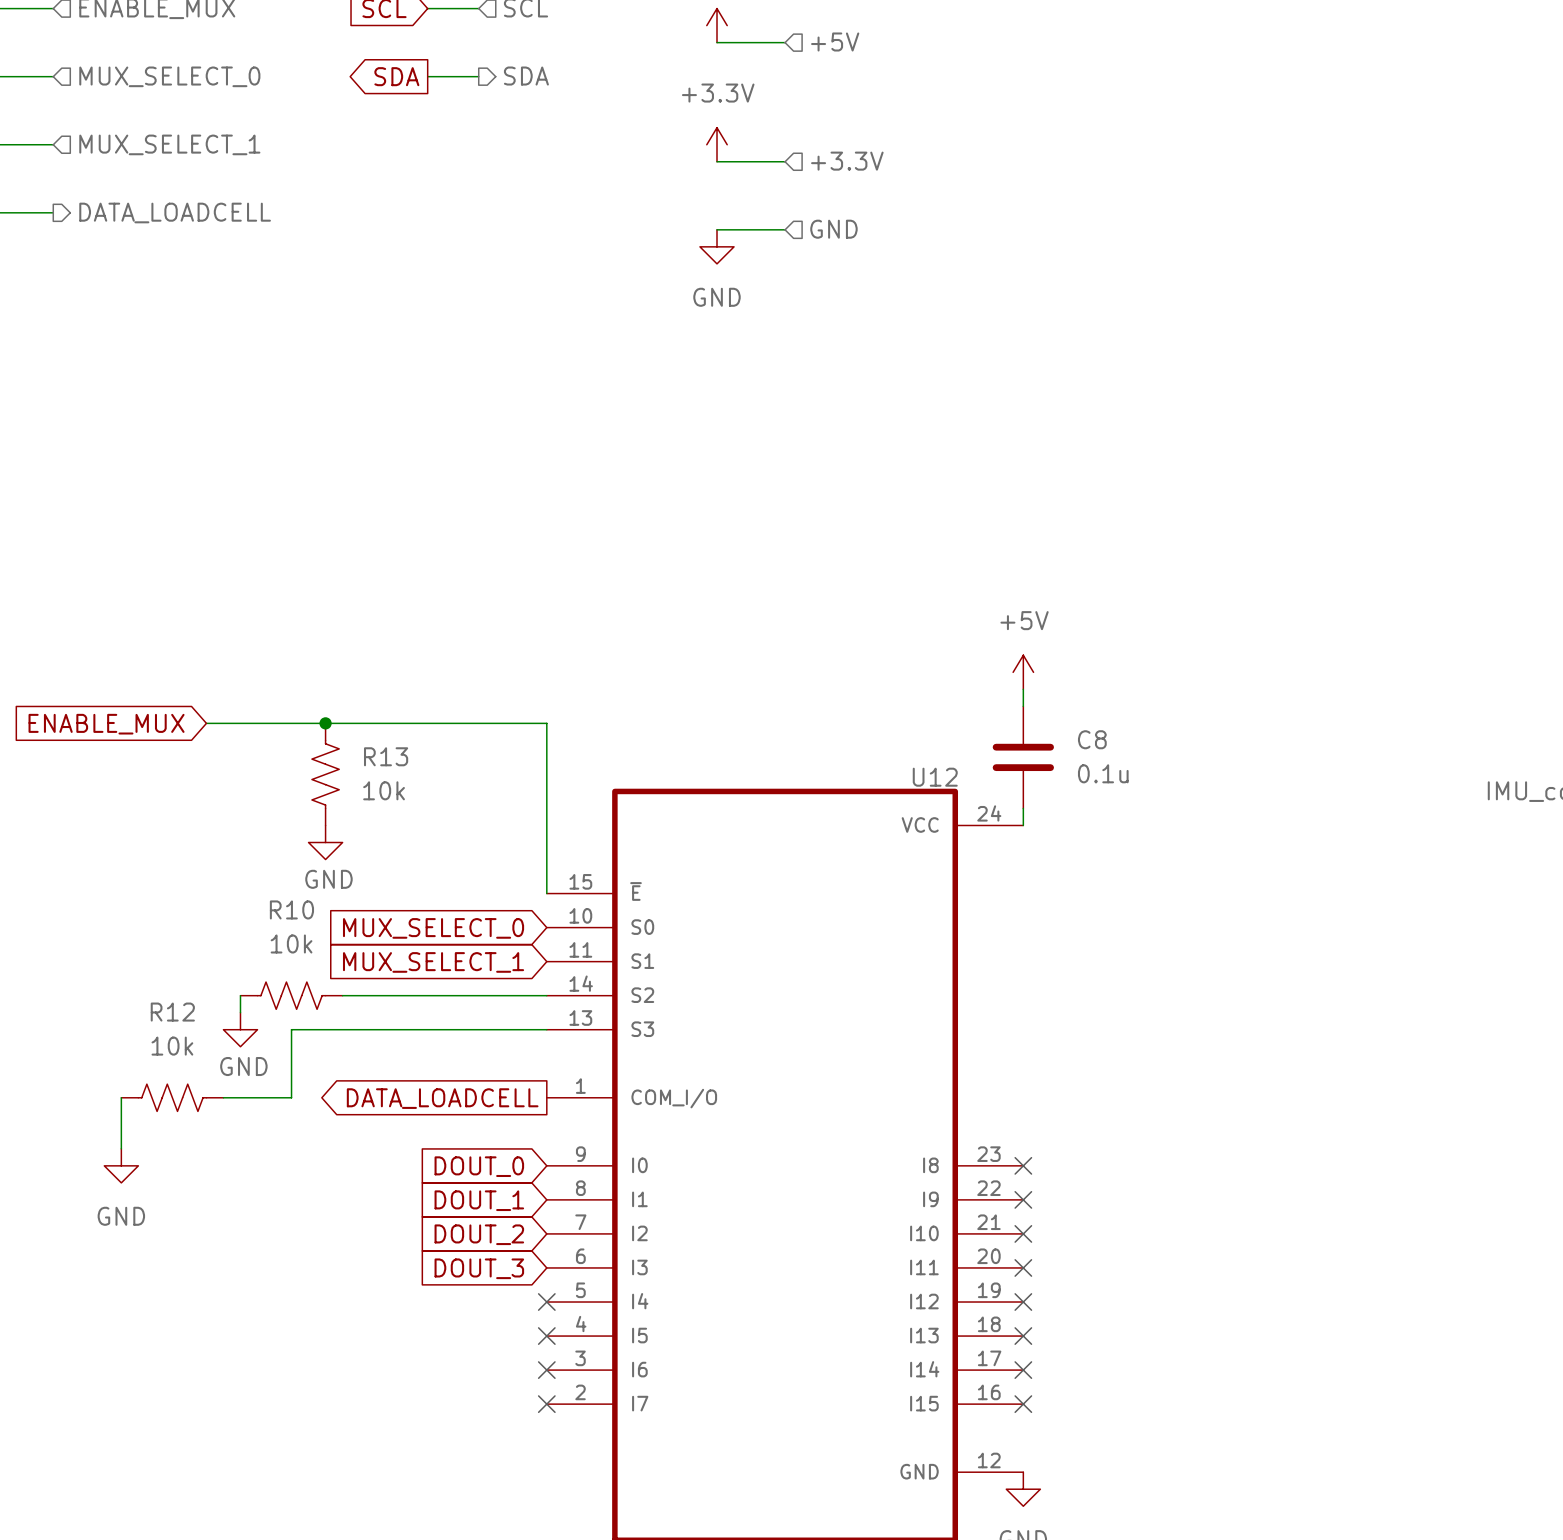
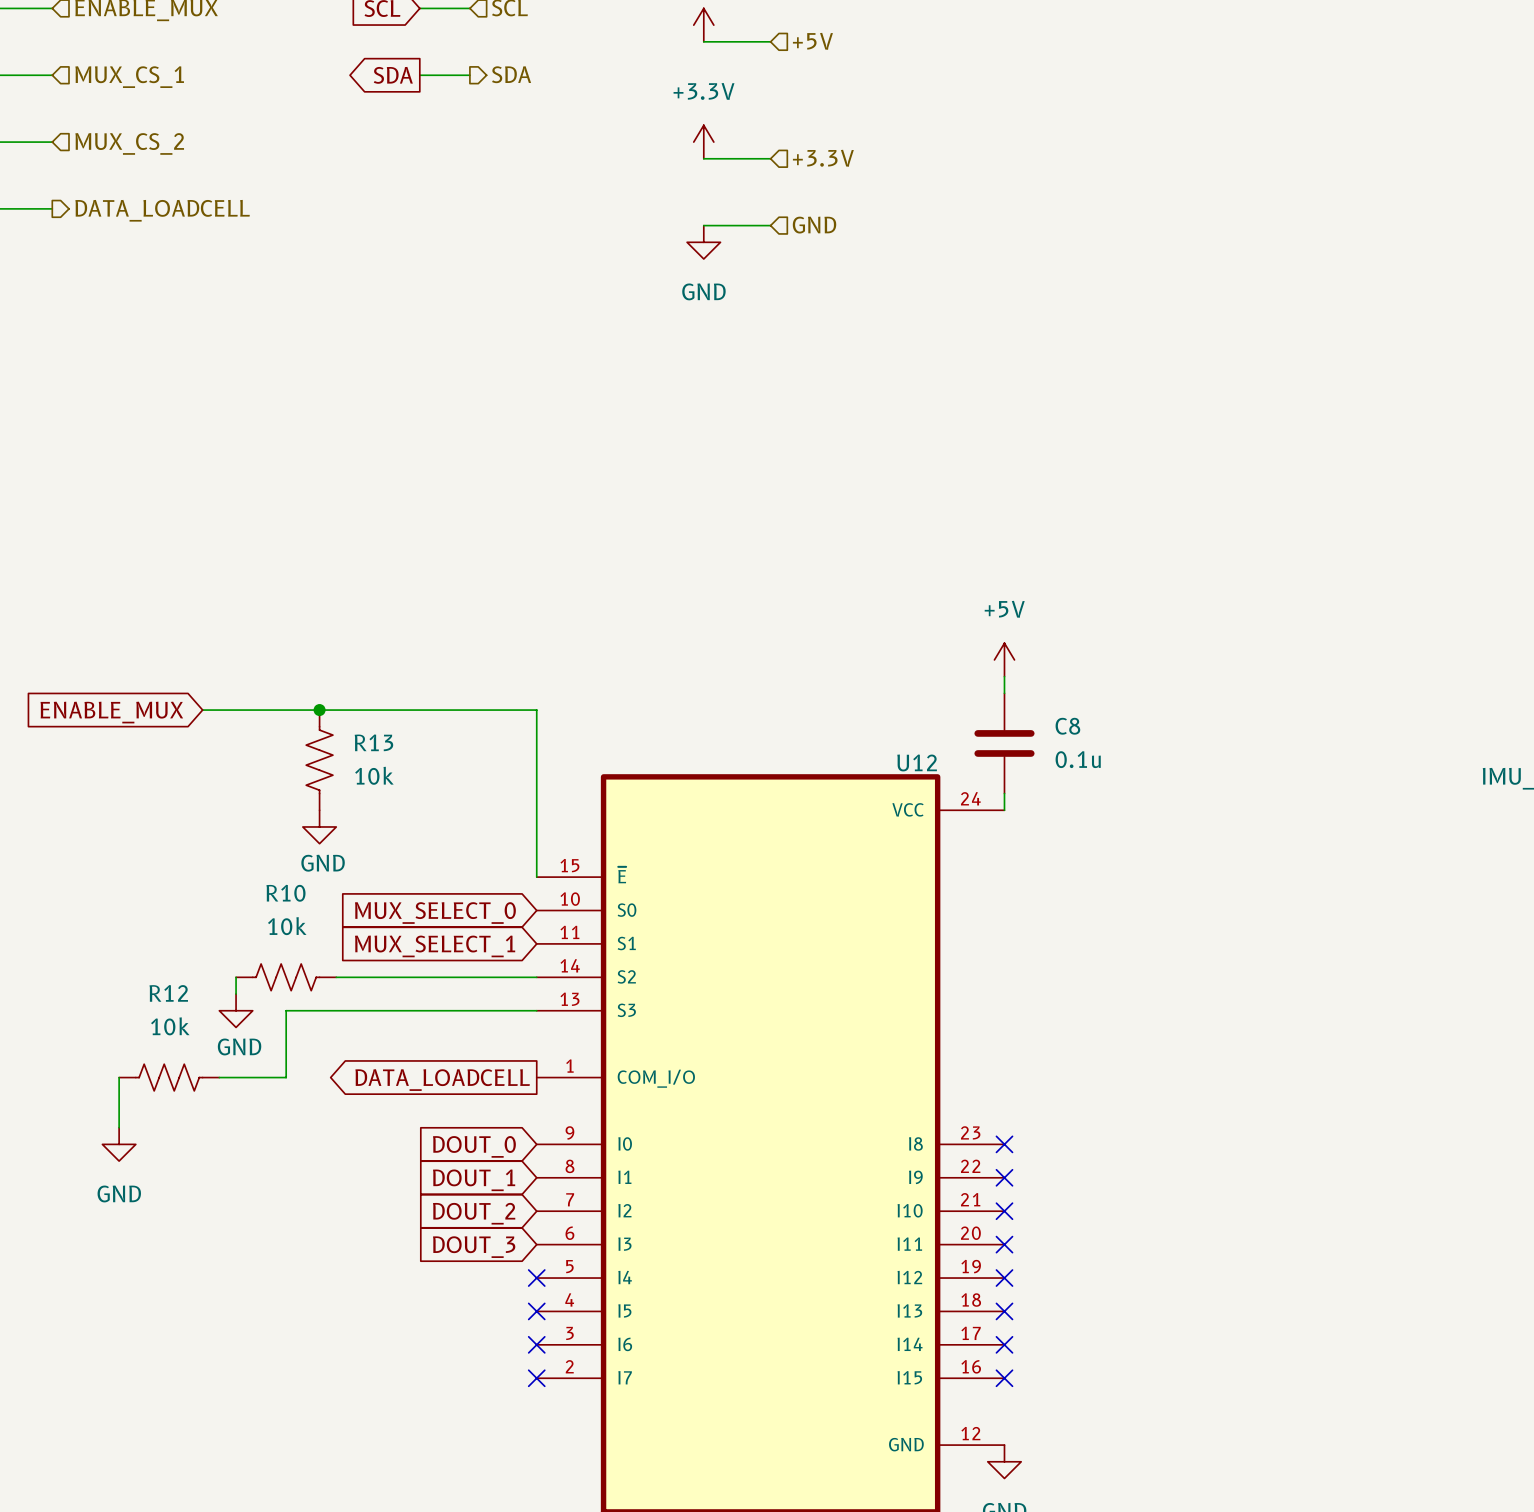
hierarchical label: MUX_SELECT_0 (169, 76) -> MUX_CS_1 (129, 77)
hierarchical label: MUX_SELECT_1 (169, 144) -> MUX_CS_2 (129, 143)

